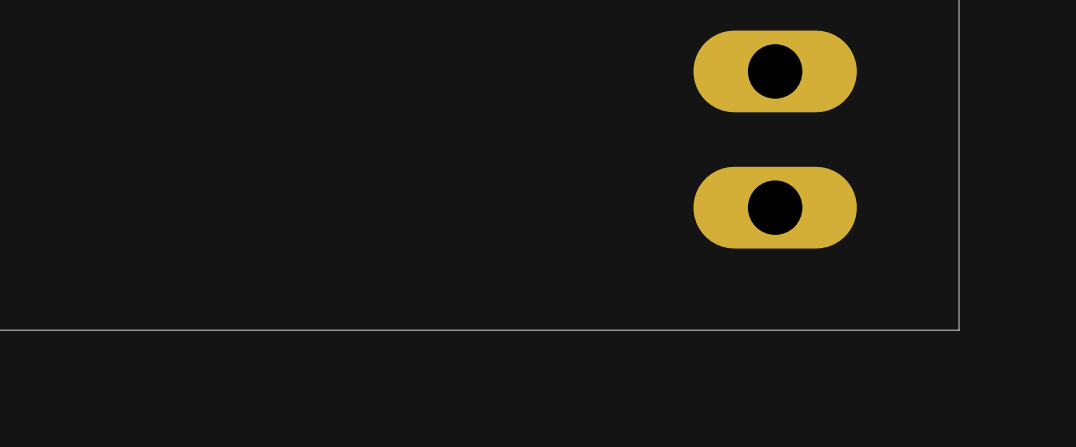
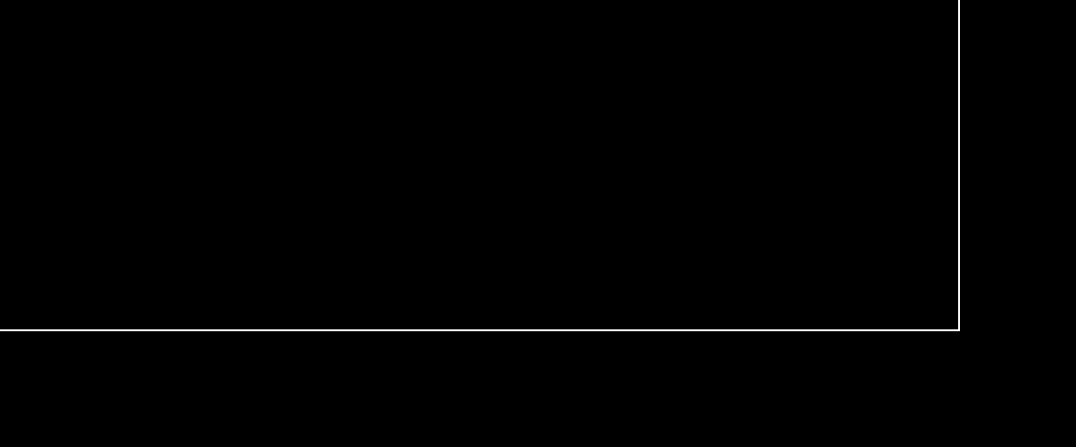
part: (775, 139) -> none

